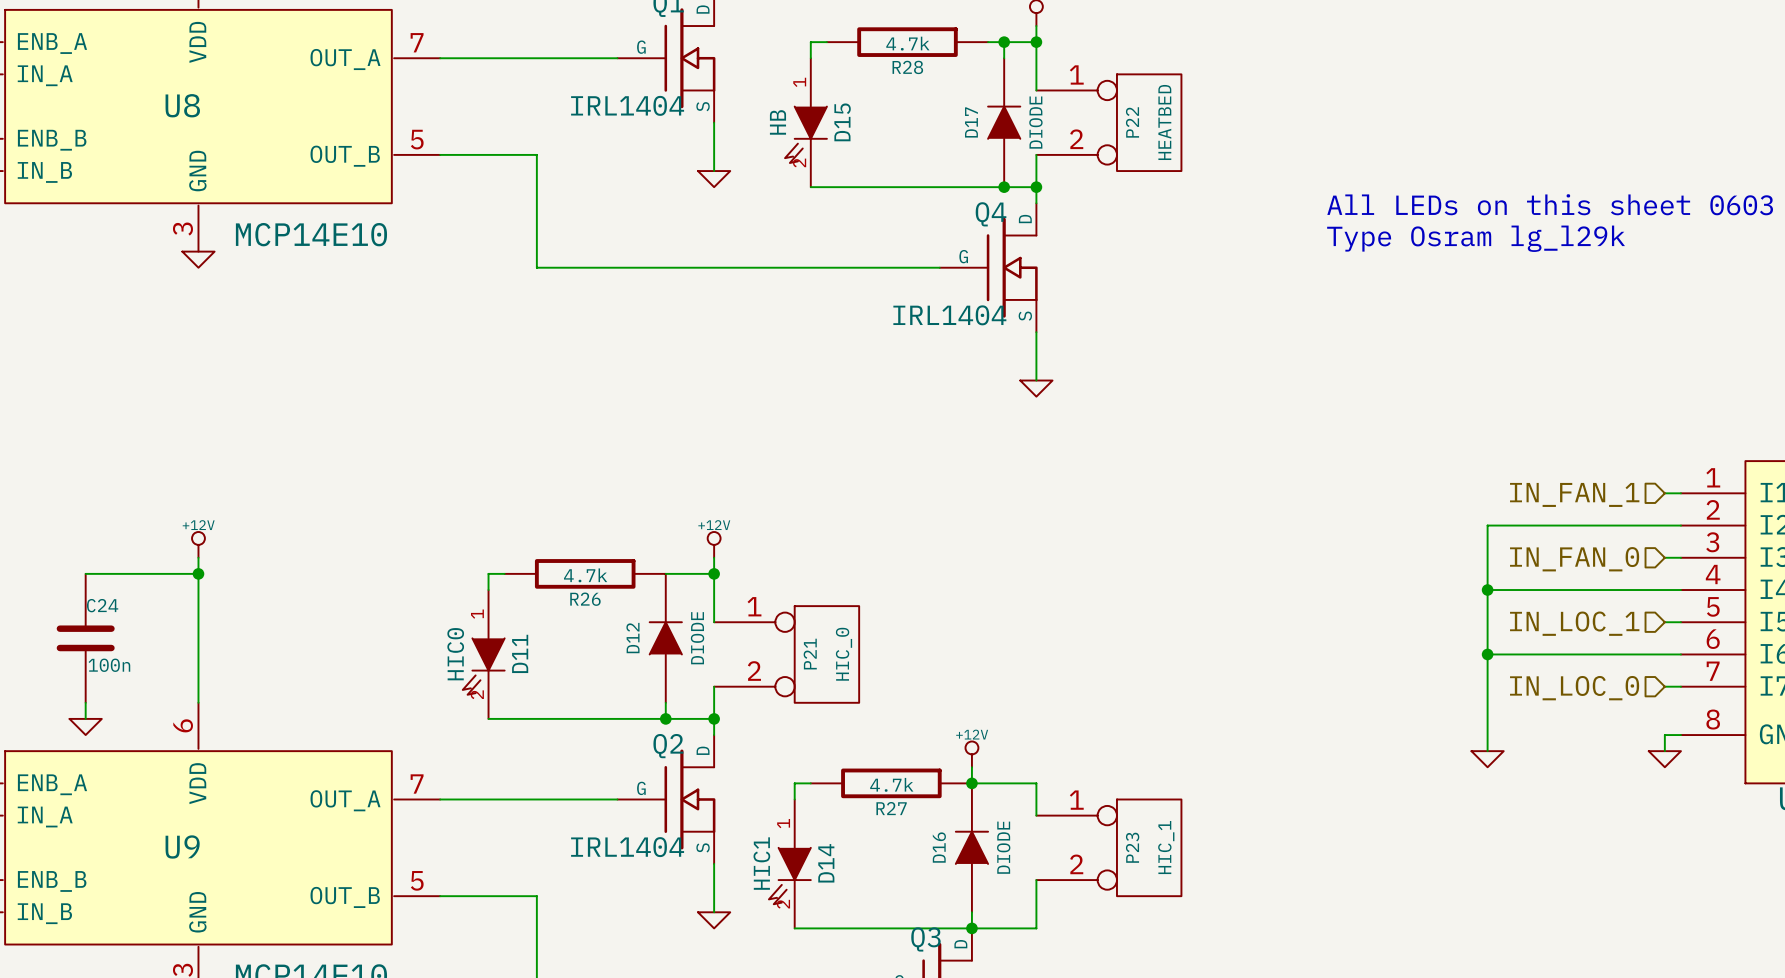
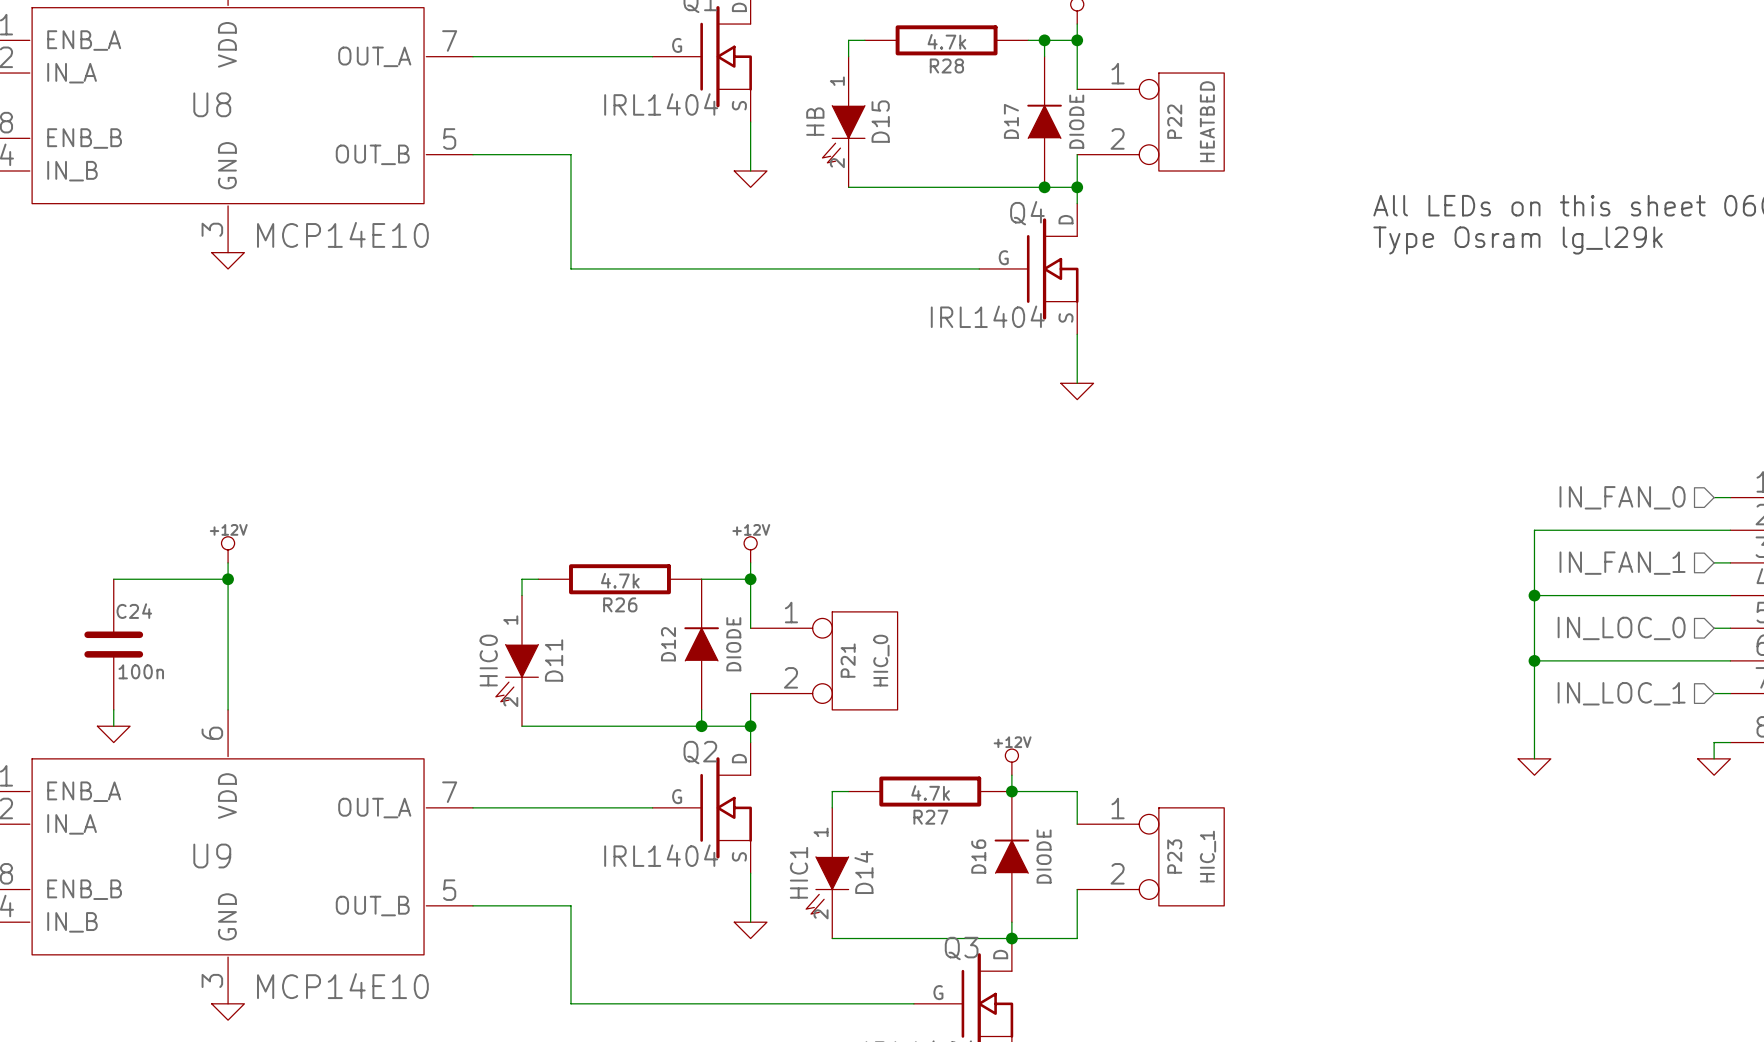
hierarchical label: IN_FAN_1 (1574, 494) -> IN_FAN_0 (1622, 497)
hierarchical label: IN_FAN_0 (1574, 559) -> IN_FAN_1 (1622, 563)
hierarchical label: IN_LOC_1 (1574, 623) -> IN_LOC_0 (1621, 628)
hierarchical label: IN_LOC_0 (1574, 688) -> IN_LOC_1 (1621, 693)

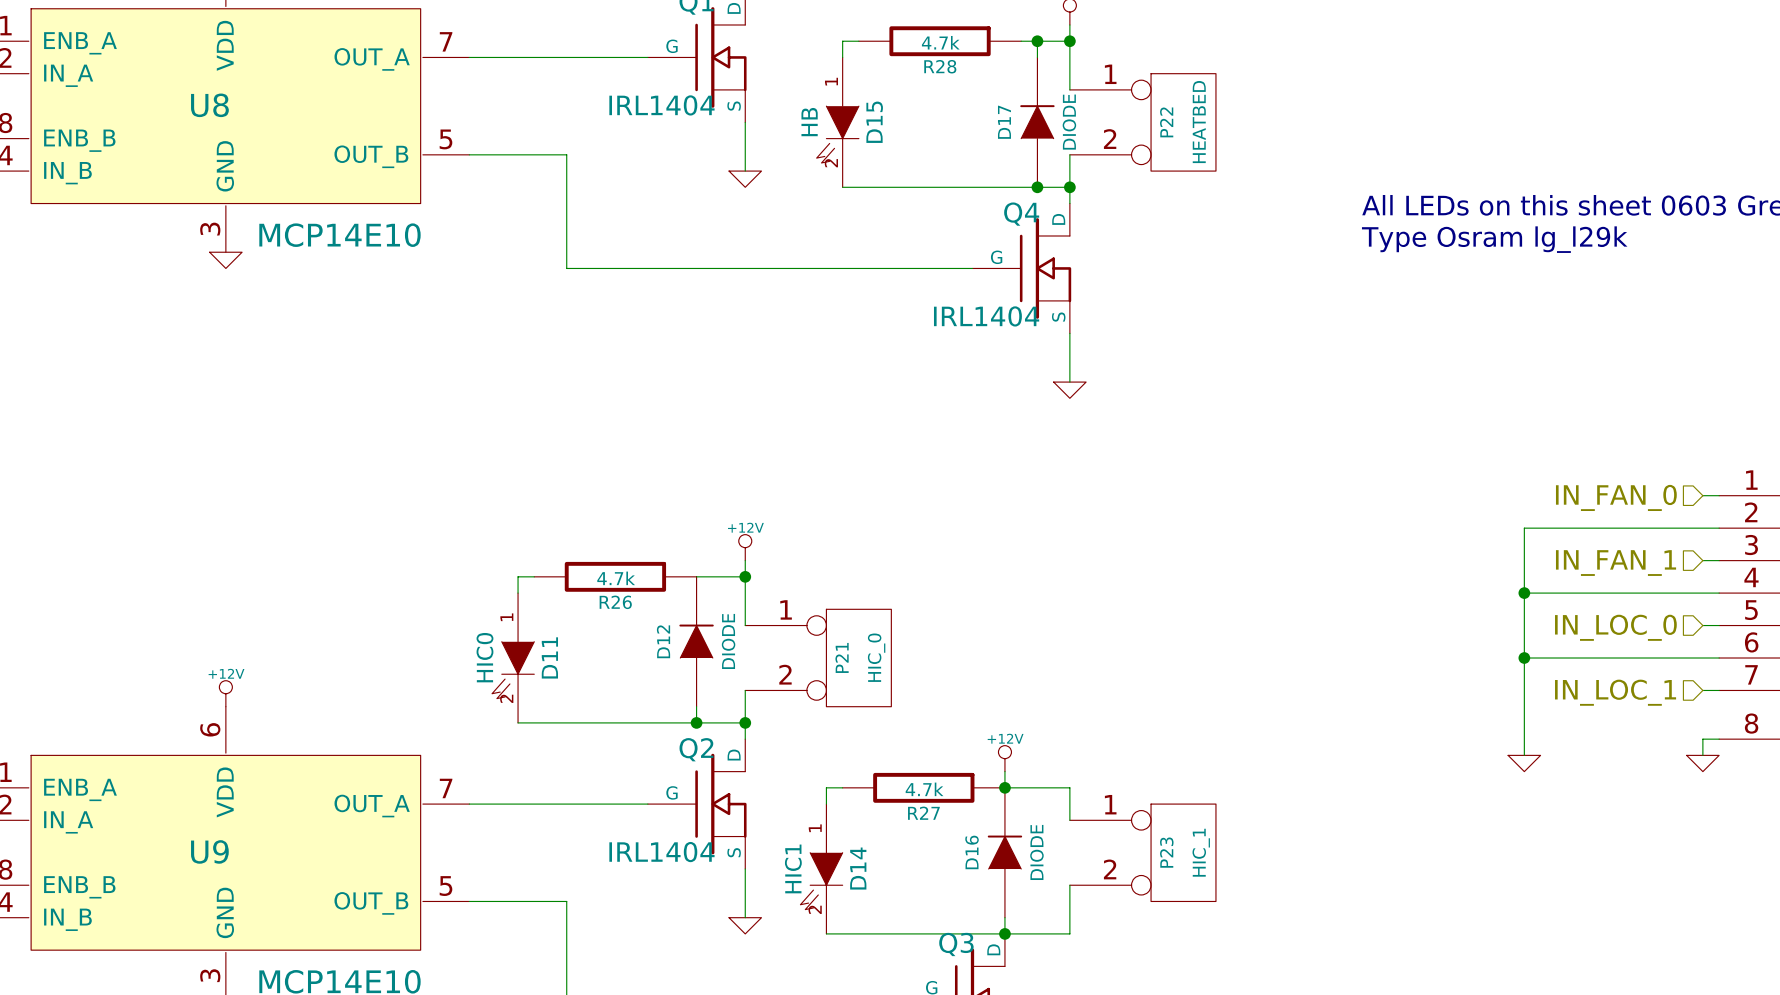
power symbol position: +12V (228, 549) -> +12V (225, 693)
wire: (228, 562) (228, 709) -> none
wire: (113, 579) (228, 579) -> none
junction: (228, 579) -> none
C24: 100n (113, 644) -> none
wire: (113, 709) (113, 726) -> none
power symbol: (113, 734) -> none

